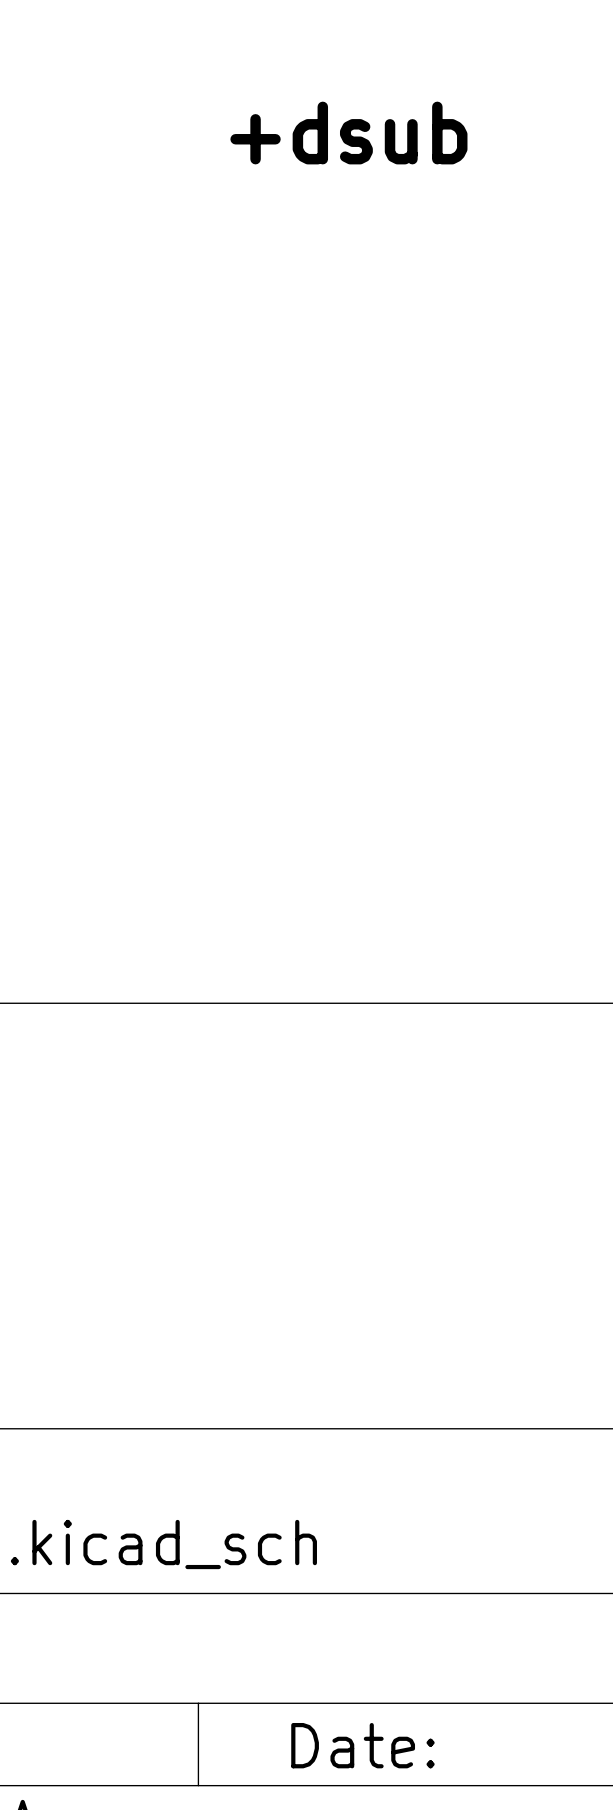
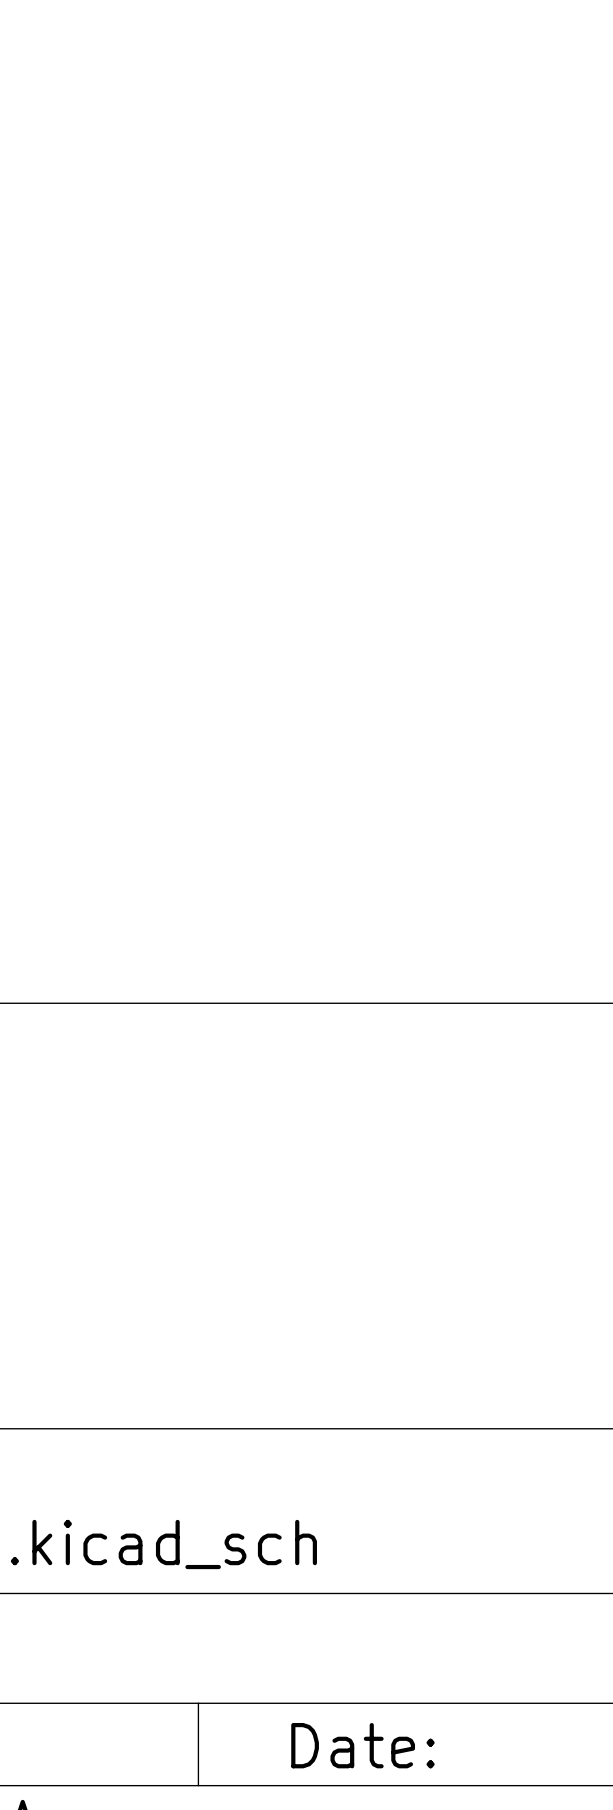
text: +dsub (348, 133) -> none

